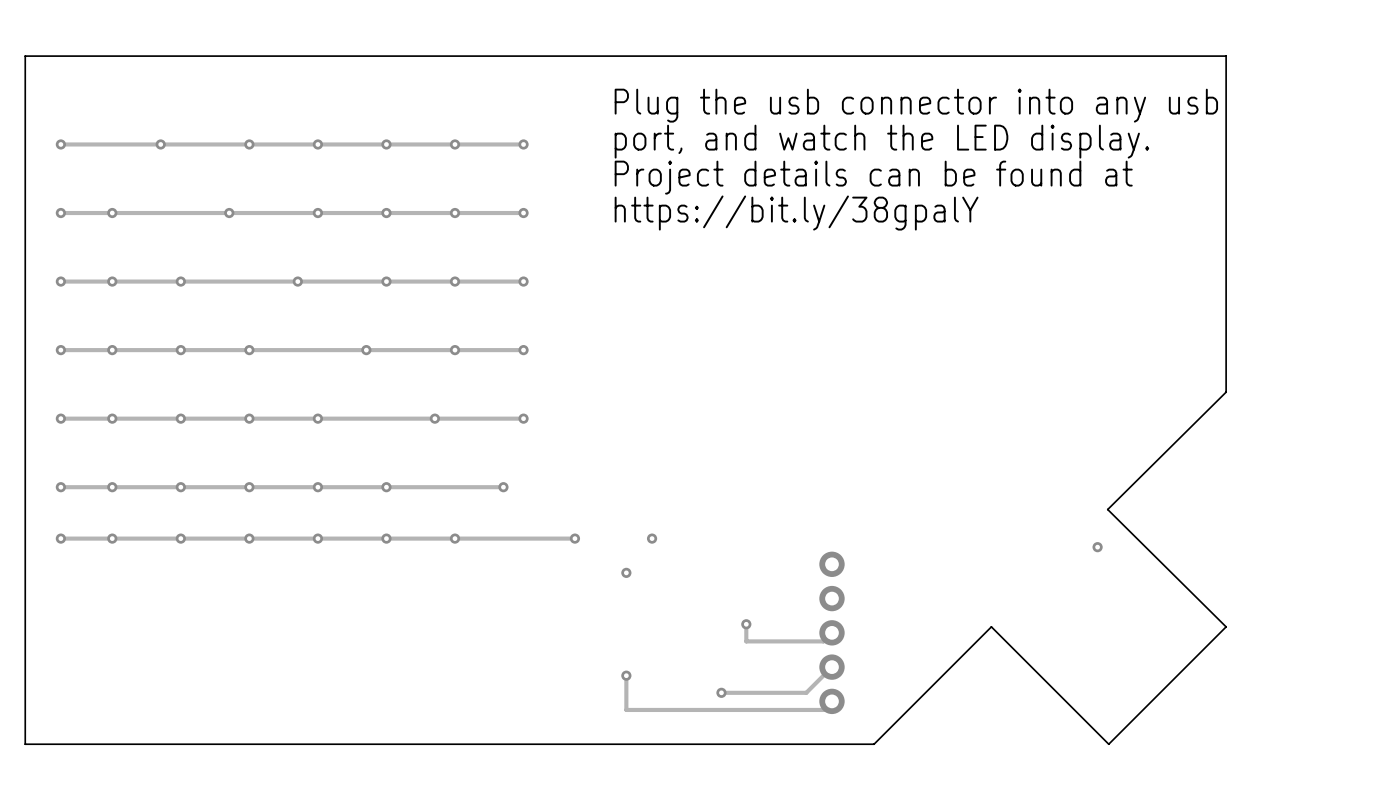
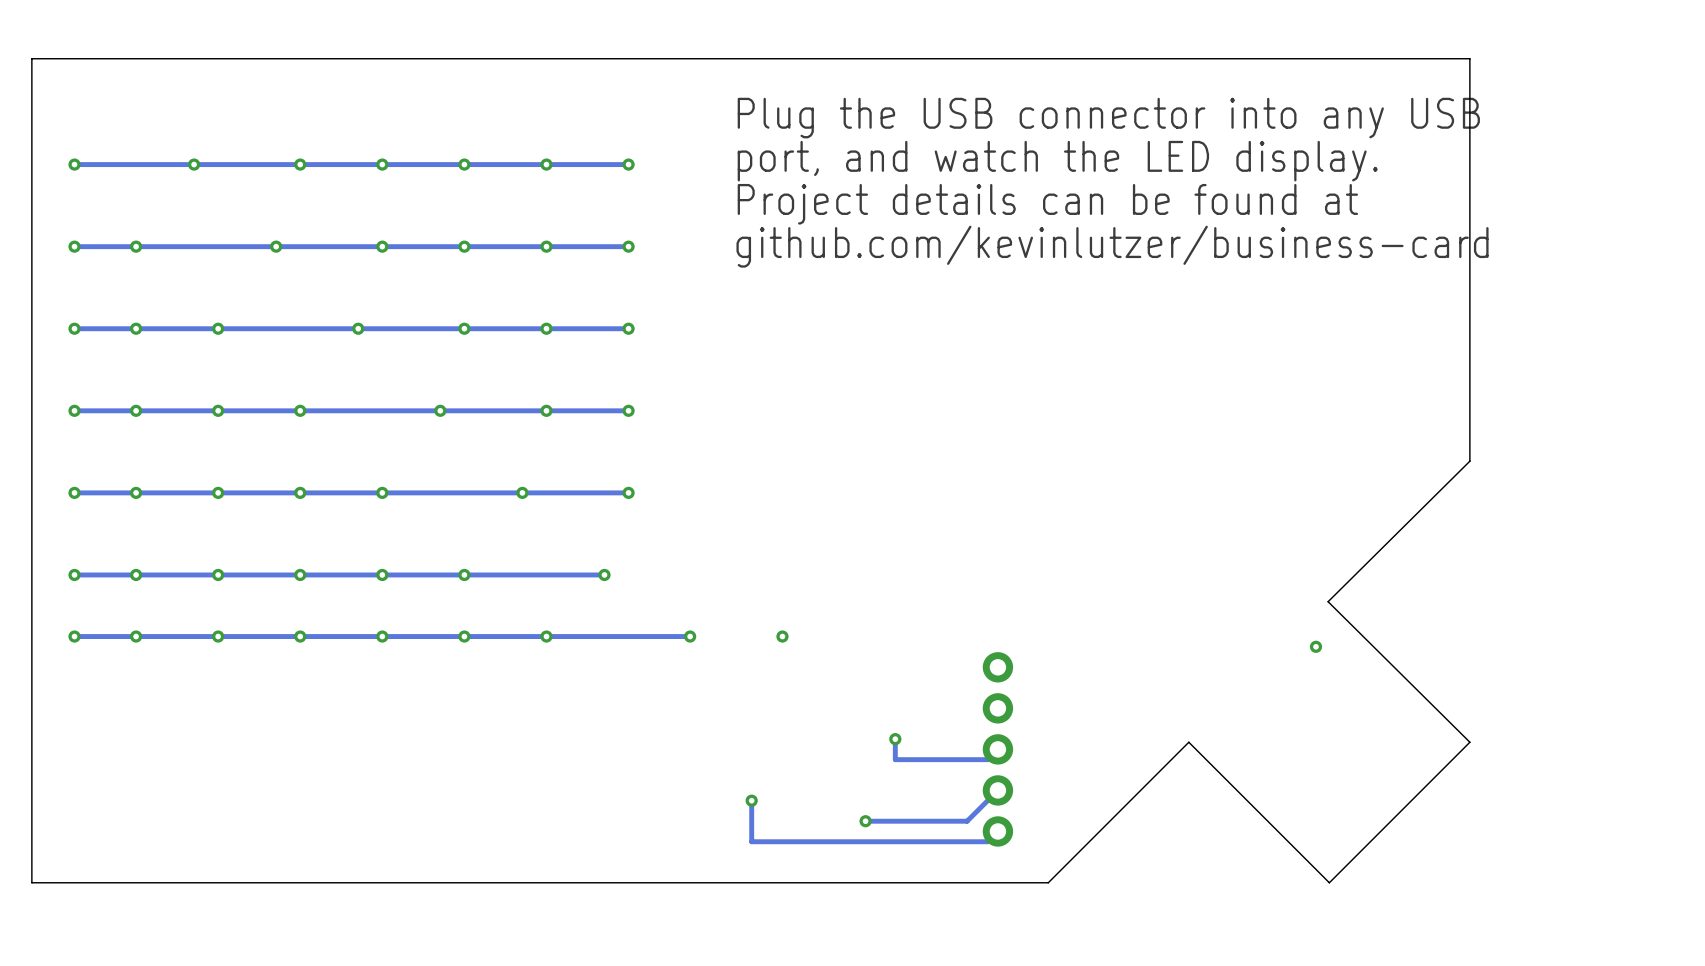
text: Plug the usb connector into any usb (916, 105) -> Plug the USB connector into any USB (1108, 118)
text: https://bit.ly/38gpalY (796, 213) -> github.com/kevinlutzer/business-card (1112, 246)
via: (626, 572) -> none

